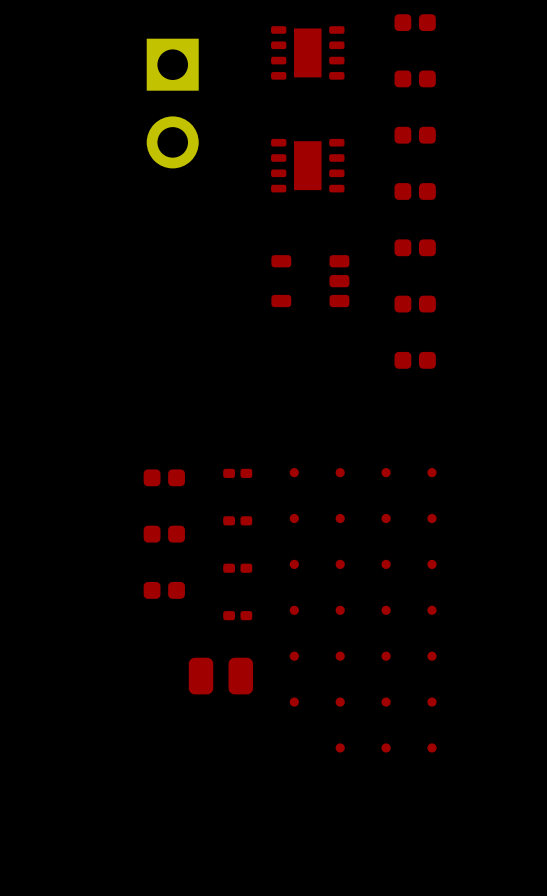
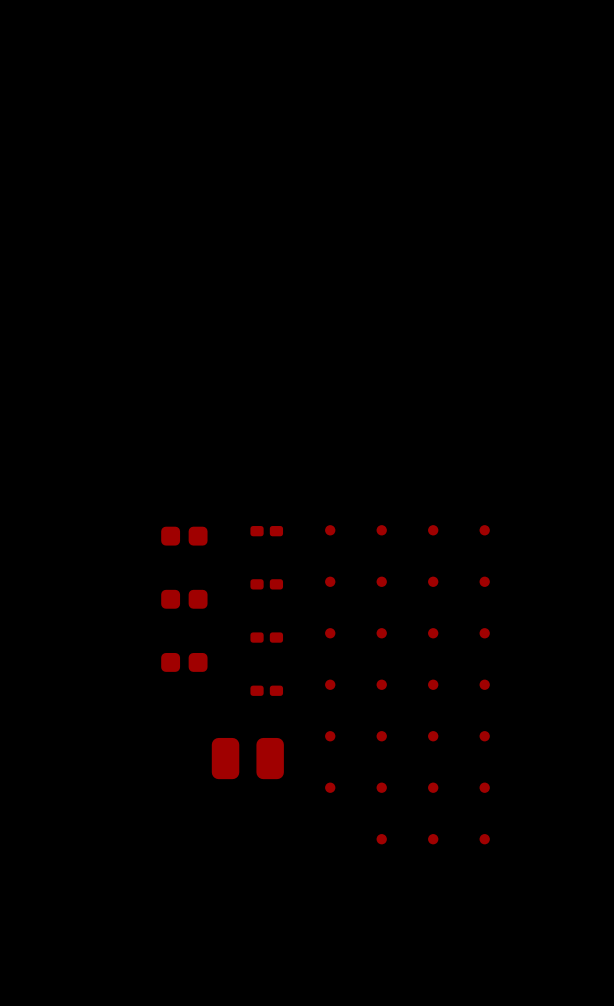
part: (415, 22) -> none
part: (307, 52) -> none
part: (415, 78) -> none
part: (172, 103) -> none
part: (415, 135) -> none
part: (307, 165) -> none
part: (415, 191) -> none
part: (415, 247) -> none
part: (310, 281) -> none
part: (415, 304) -> none
part: (415, 360) -> none

